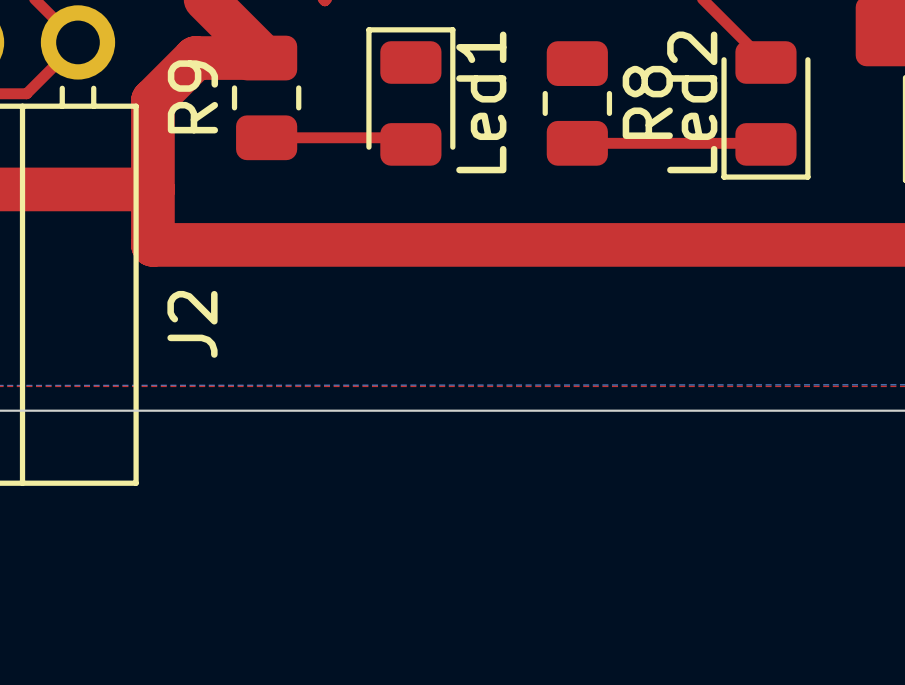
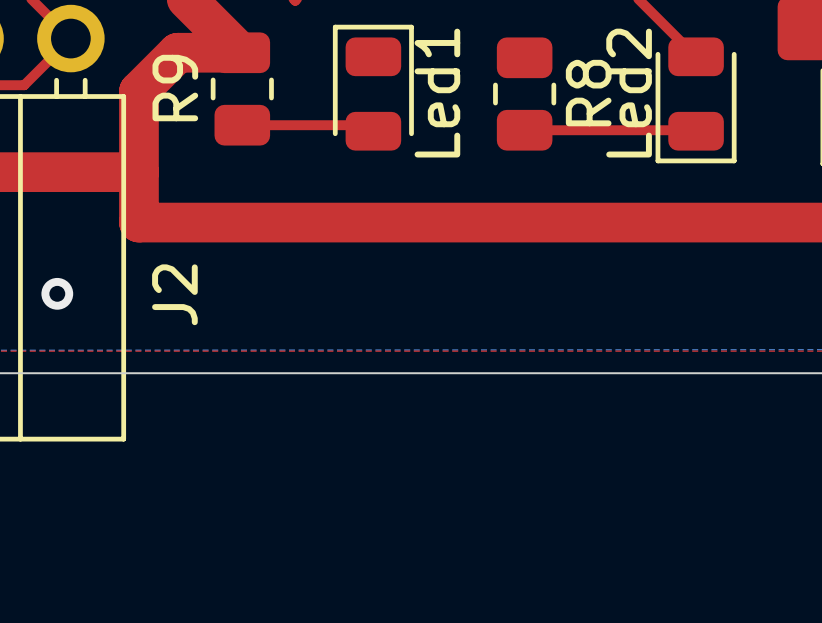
via: none -> (57, 293)

